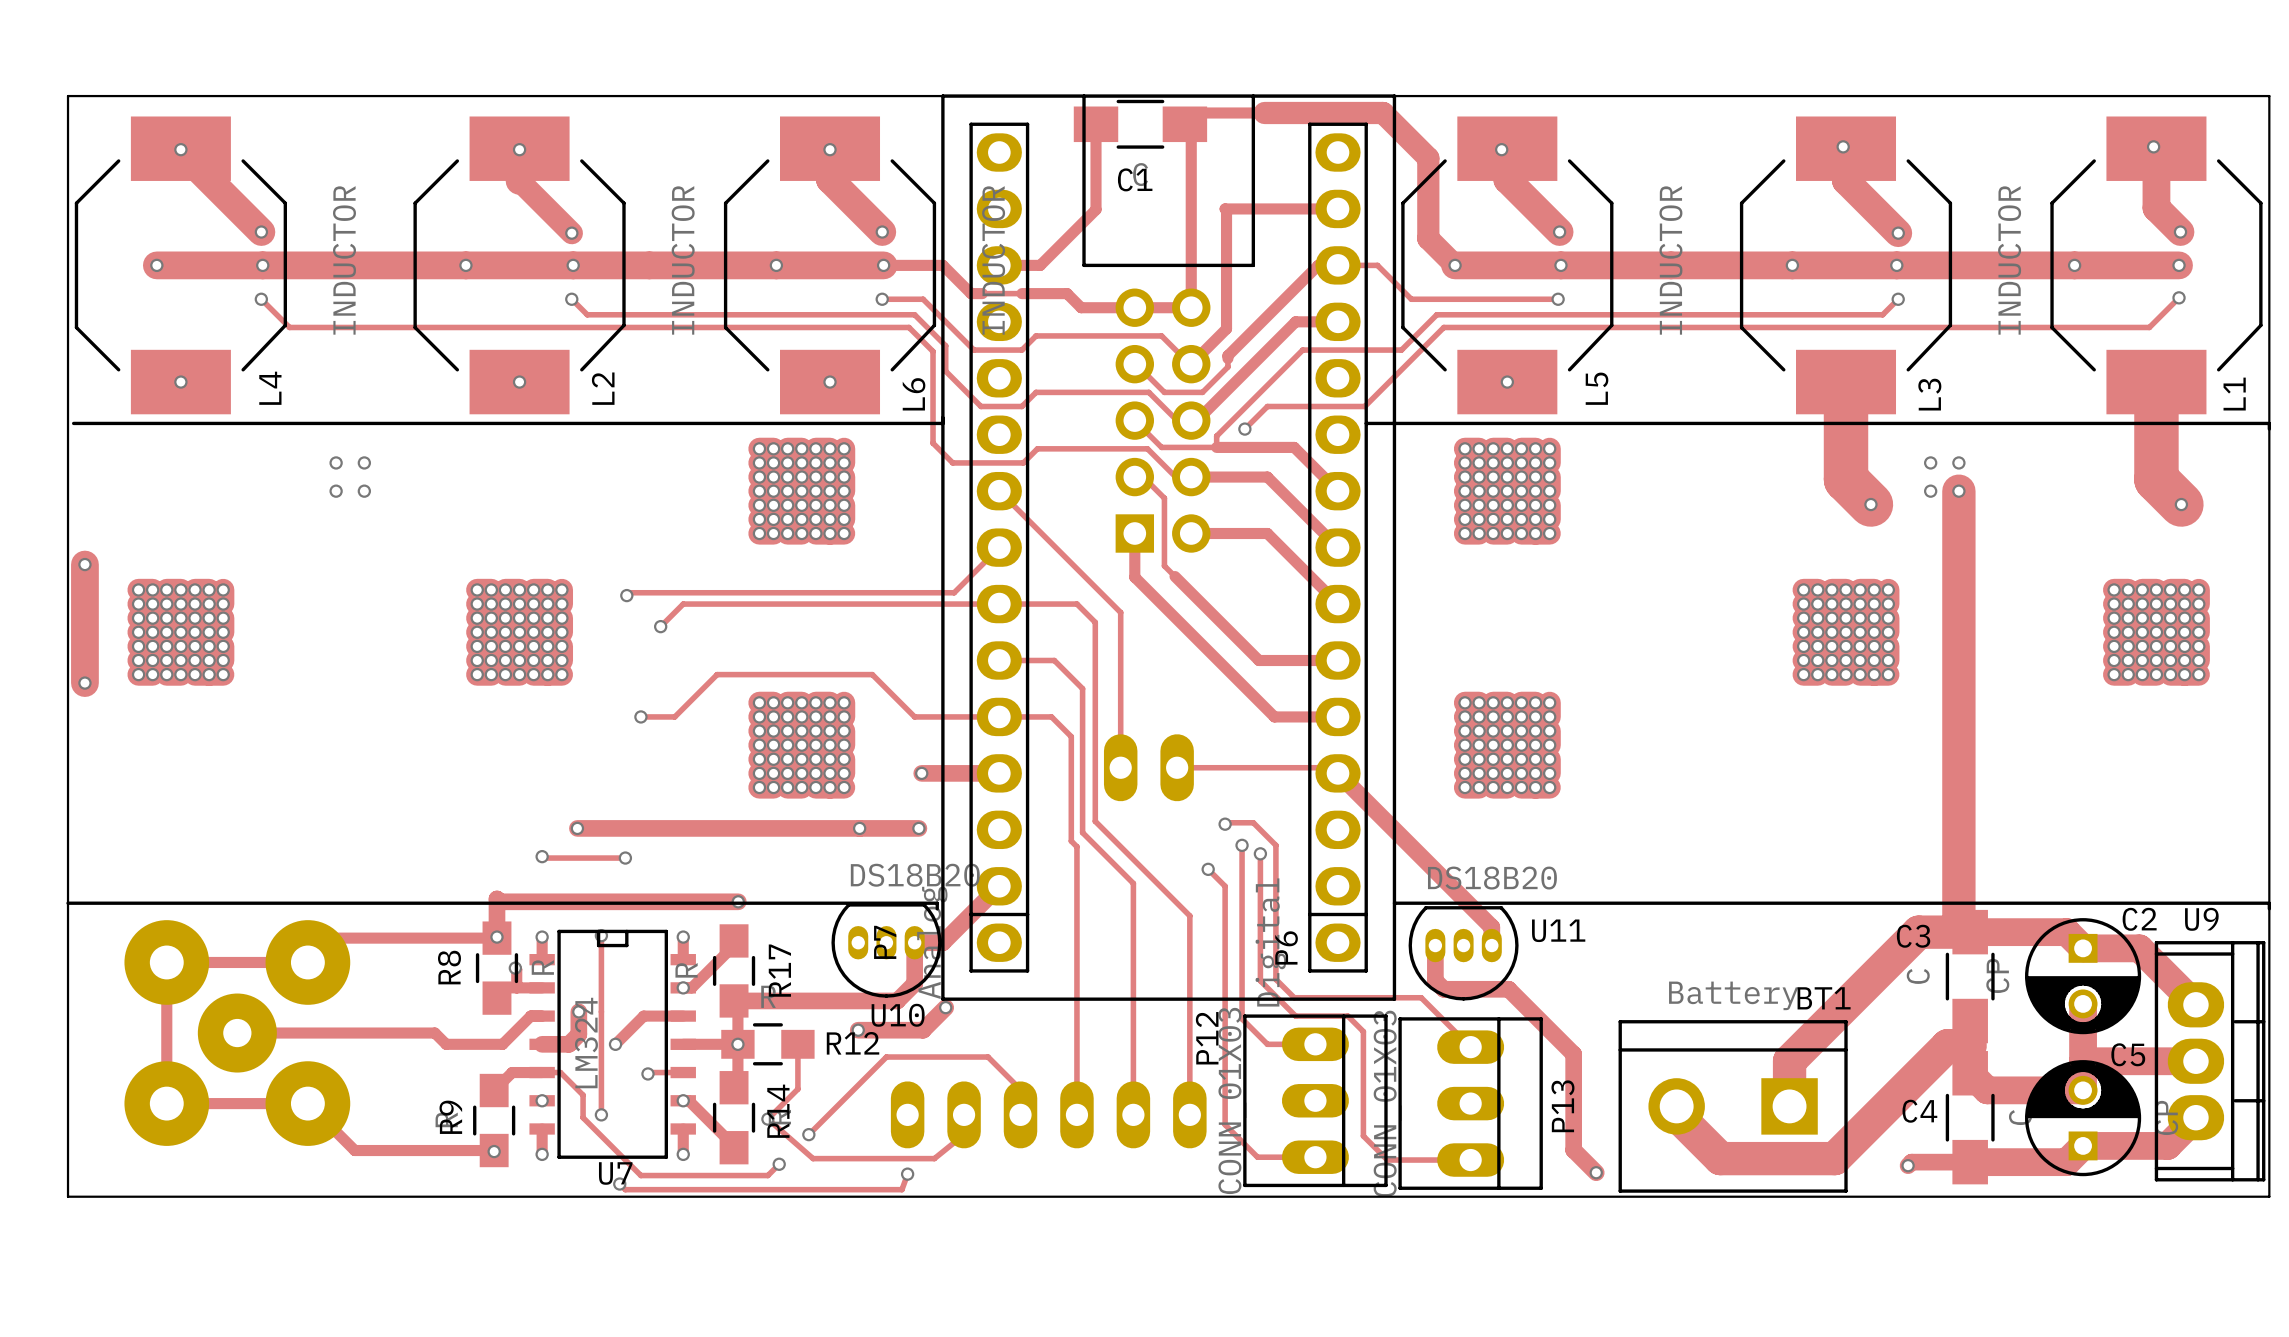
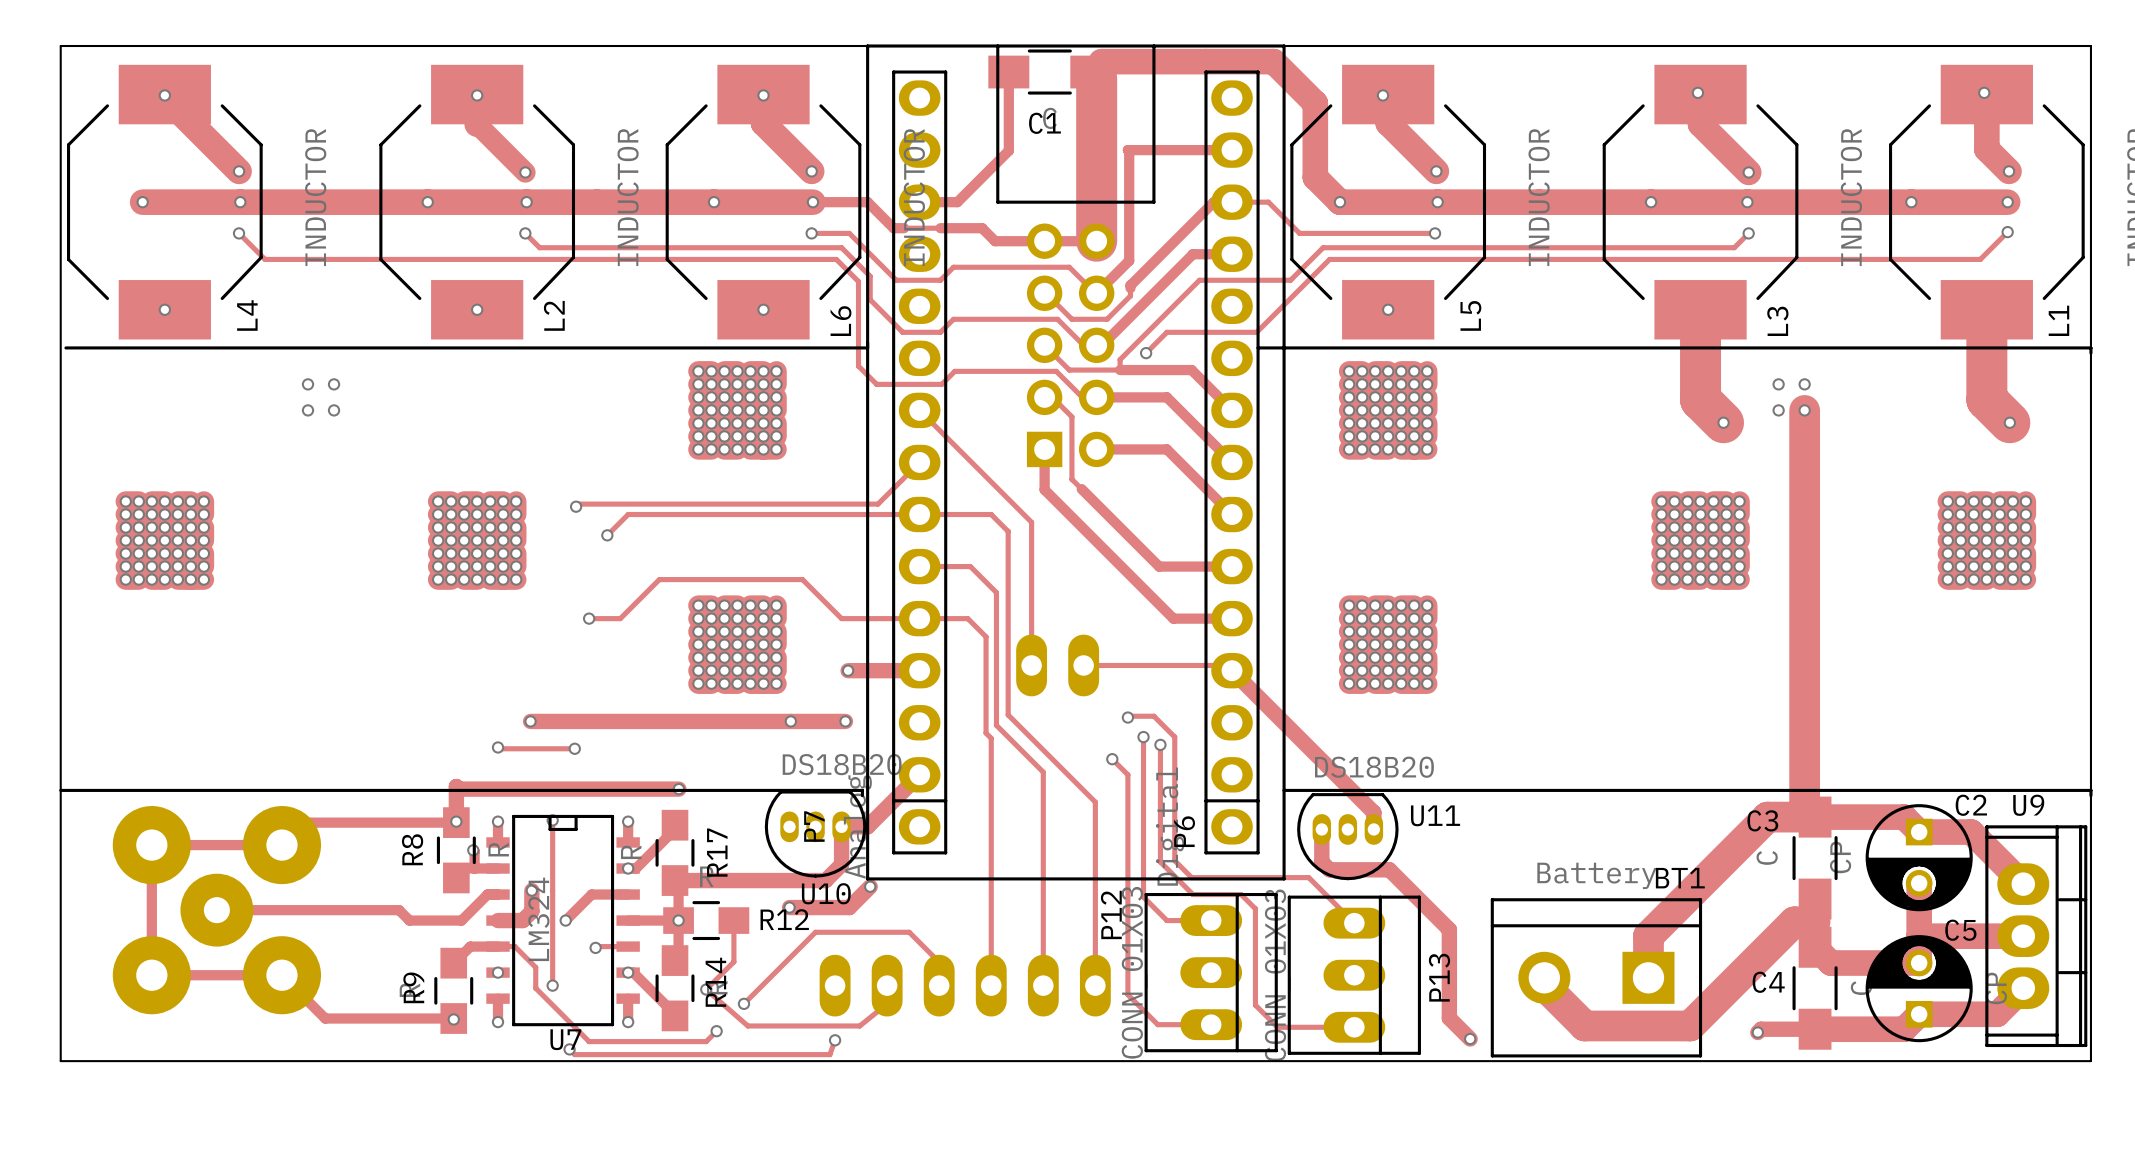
track width: thin (1196, 112) (1383, 112) (1428, 158) (1428, 238) (1455, 265) -> thick (1101, 61) (1273, 61) (1315, 103) (1315, 177) (1339, 202)
track width: thin (1191, 130) (1191, 307) -> thick (1096, 77) (1096, 241)
track: (84, 564) (84, 683) -> none
via: (84, 564) -> none
via: (84, 683) -> none

